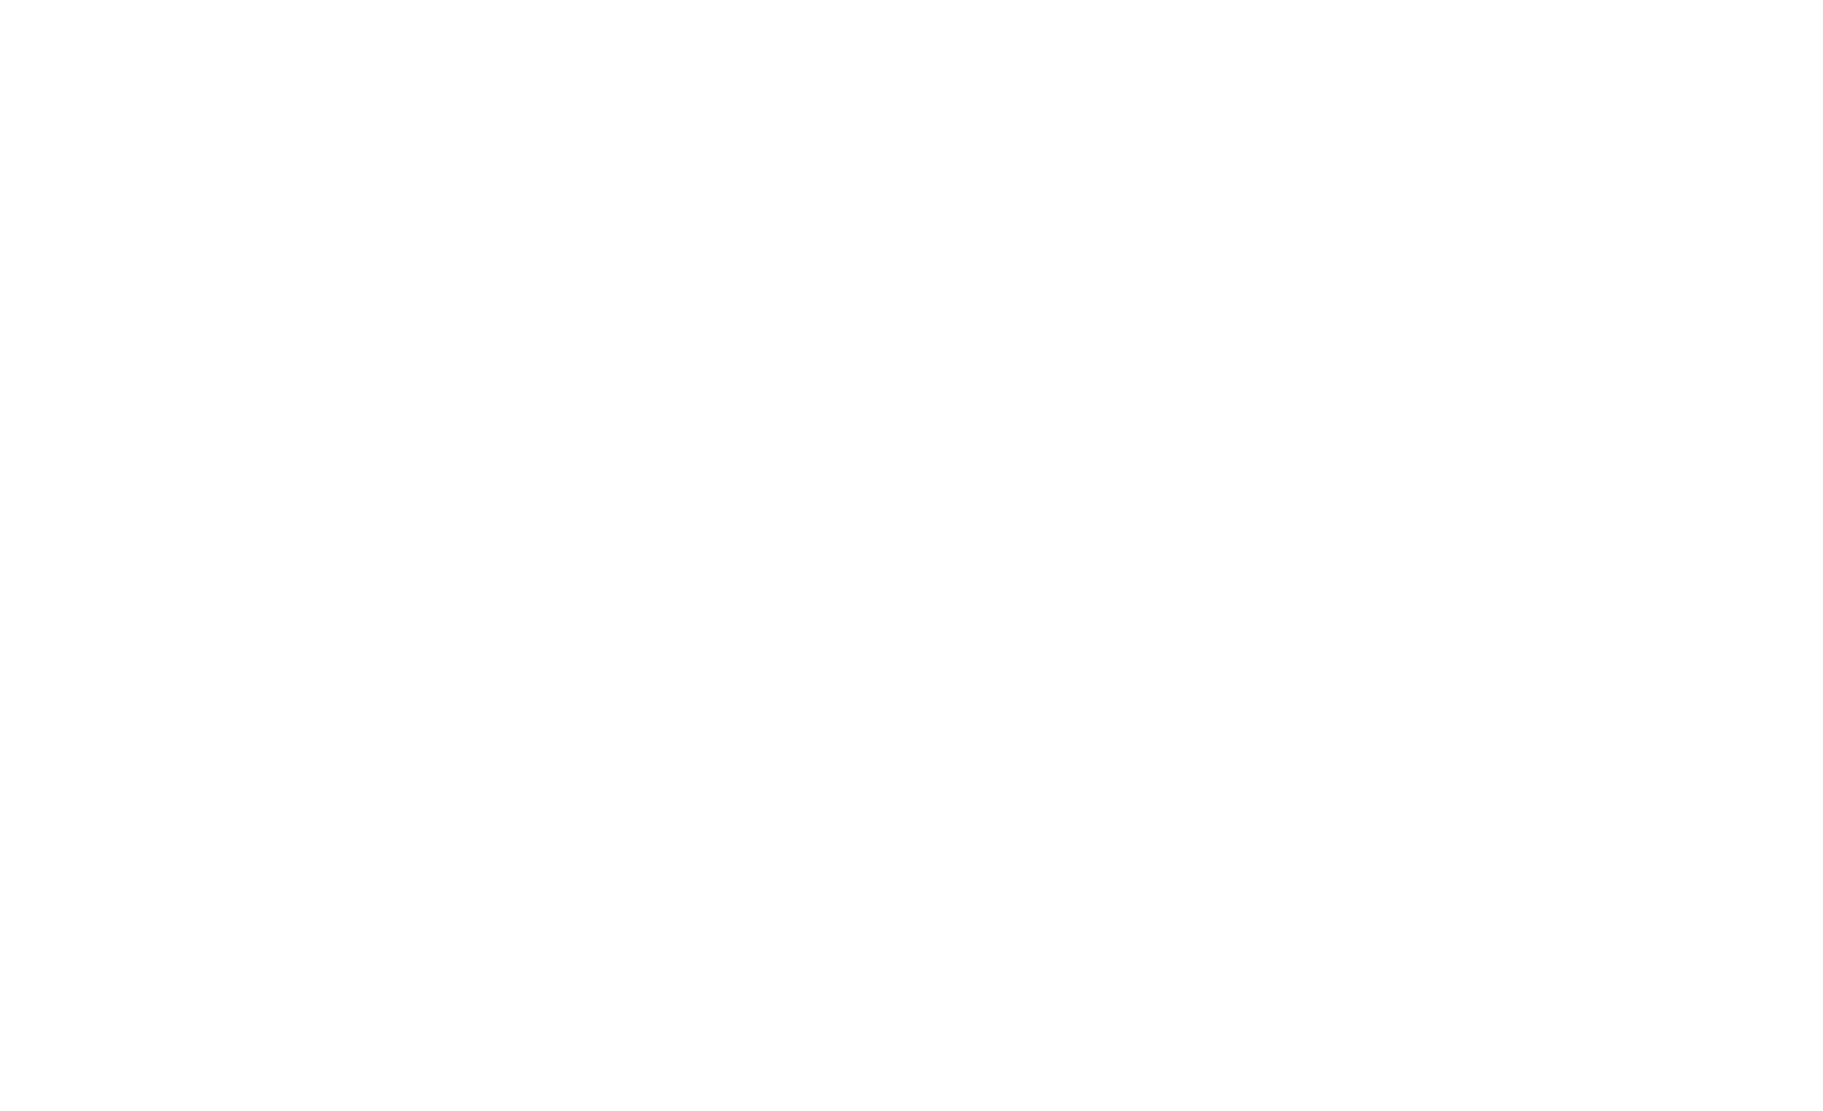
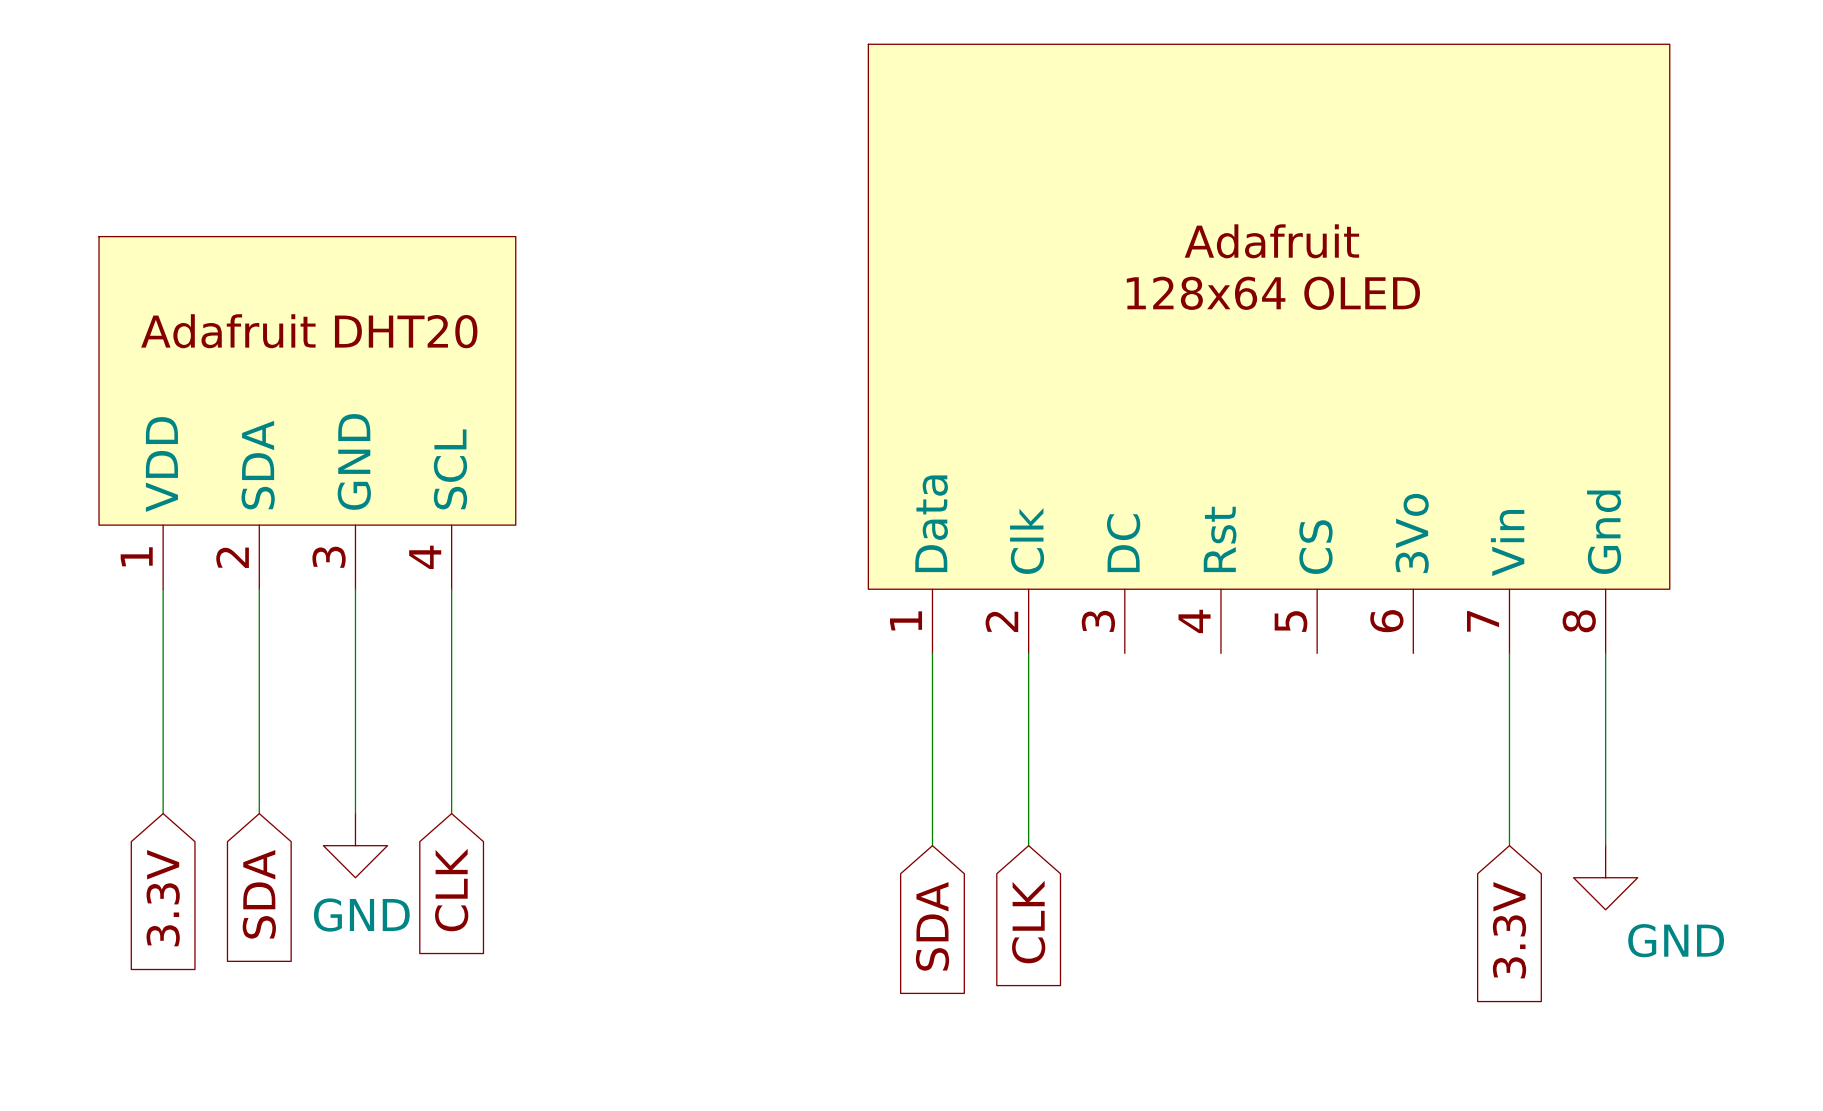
part: none -> (1269, 348)
part: none -> (307, 412)
wire: none -> (163, 589) (163, 813)
wire: none -> (259, 589) (259, 813)
wire: none -> (355, 589) (355, 813)
wire: none -> (451, 589) (451, 813)
wire: none -> (932, 653) (932, 845)
wire: none -> (1028, 653) (1028, 845)
wire: none -> (1509, 653) (1509, 845)
wire: none -> (1605, 653) (1605, 845)
power symbol: none -> GND (355, 845)
power symbol: none -> GND (1605, 877)
global label: none -> SDA (259, 894)
global label: none -> CLK (451, 890)
global label: none -> 3.3V (163, 898)
global label: none -> SDA (932, 926)
global label: none -> CLK (1028, 922)
global label: none -> 3.3V (1509, 930)

